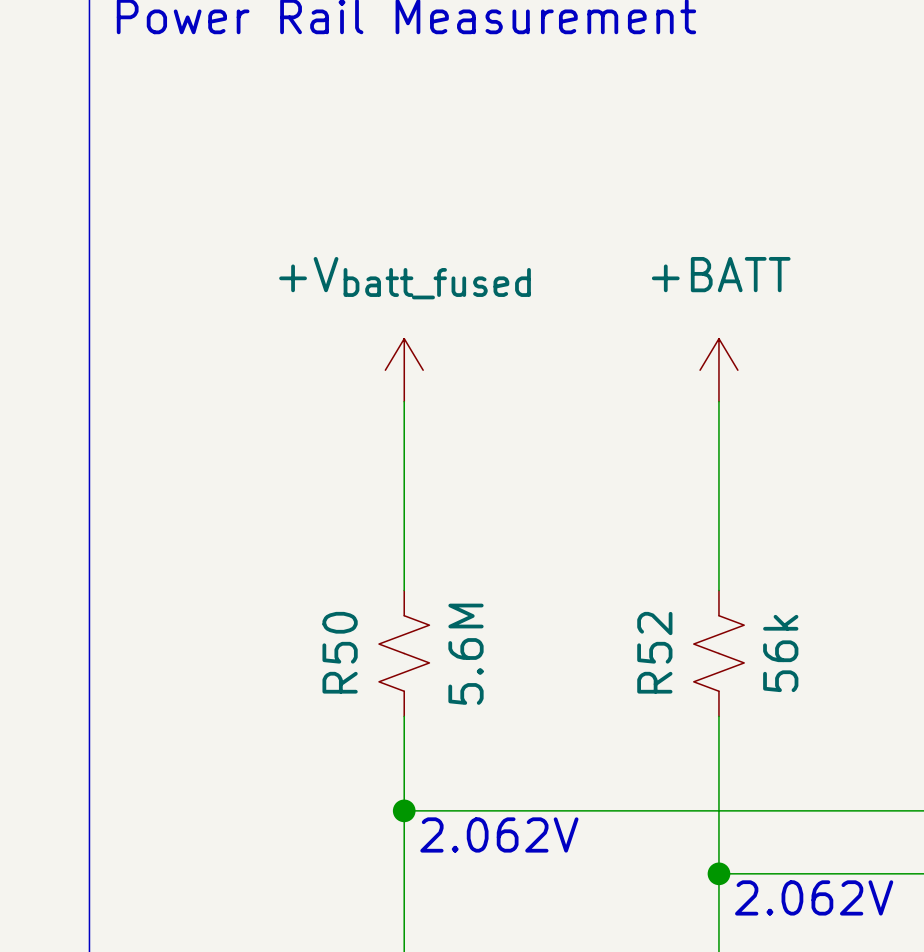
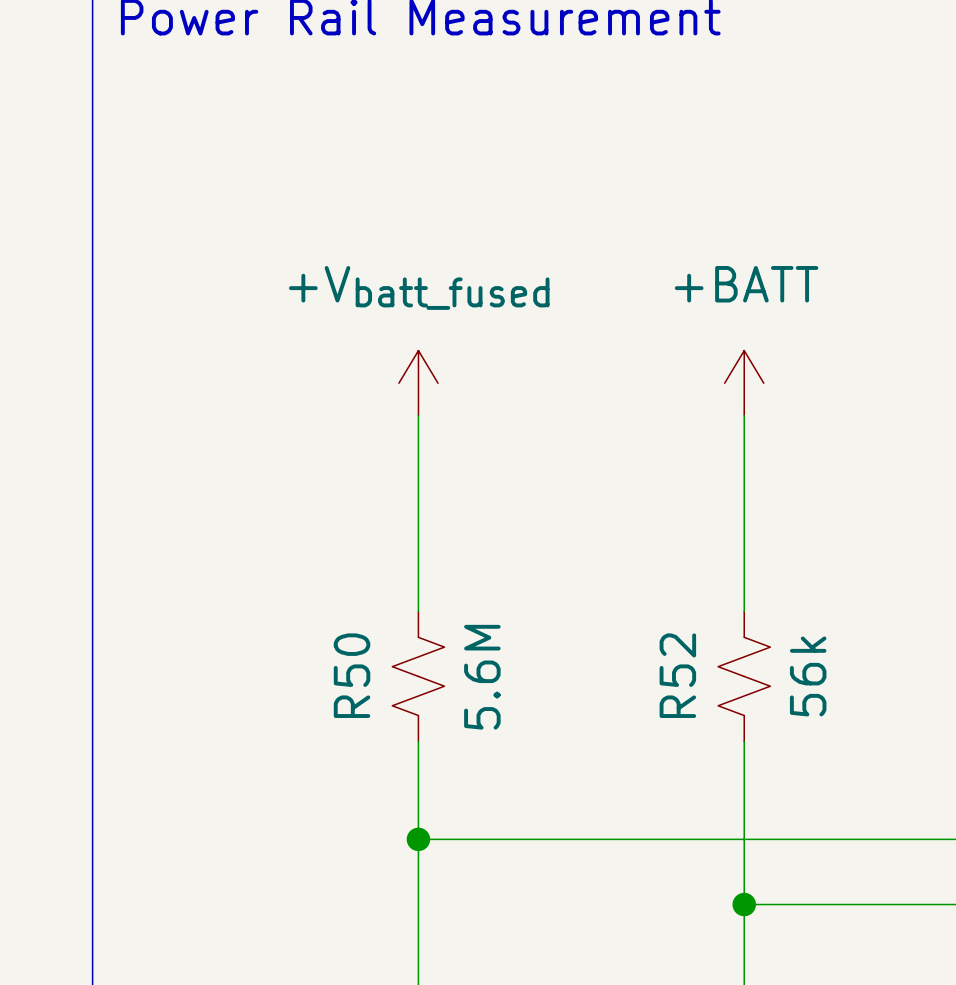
text: 2.062V (499, 834) -> none
text: 2.062V (814, 897) -> none

